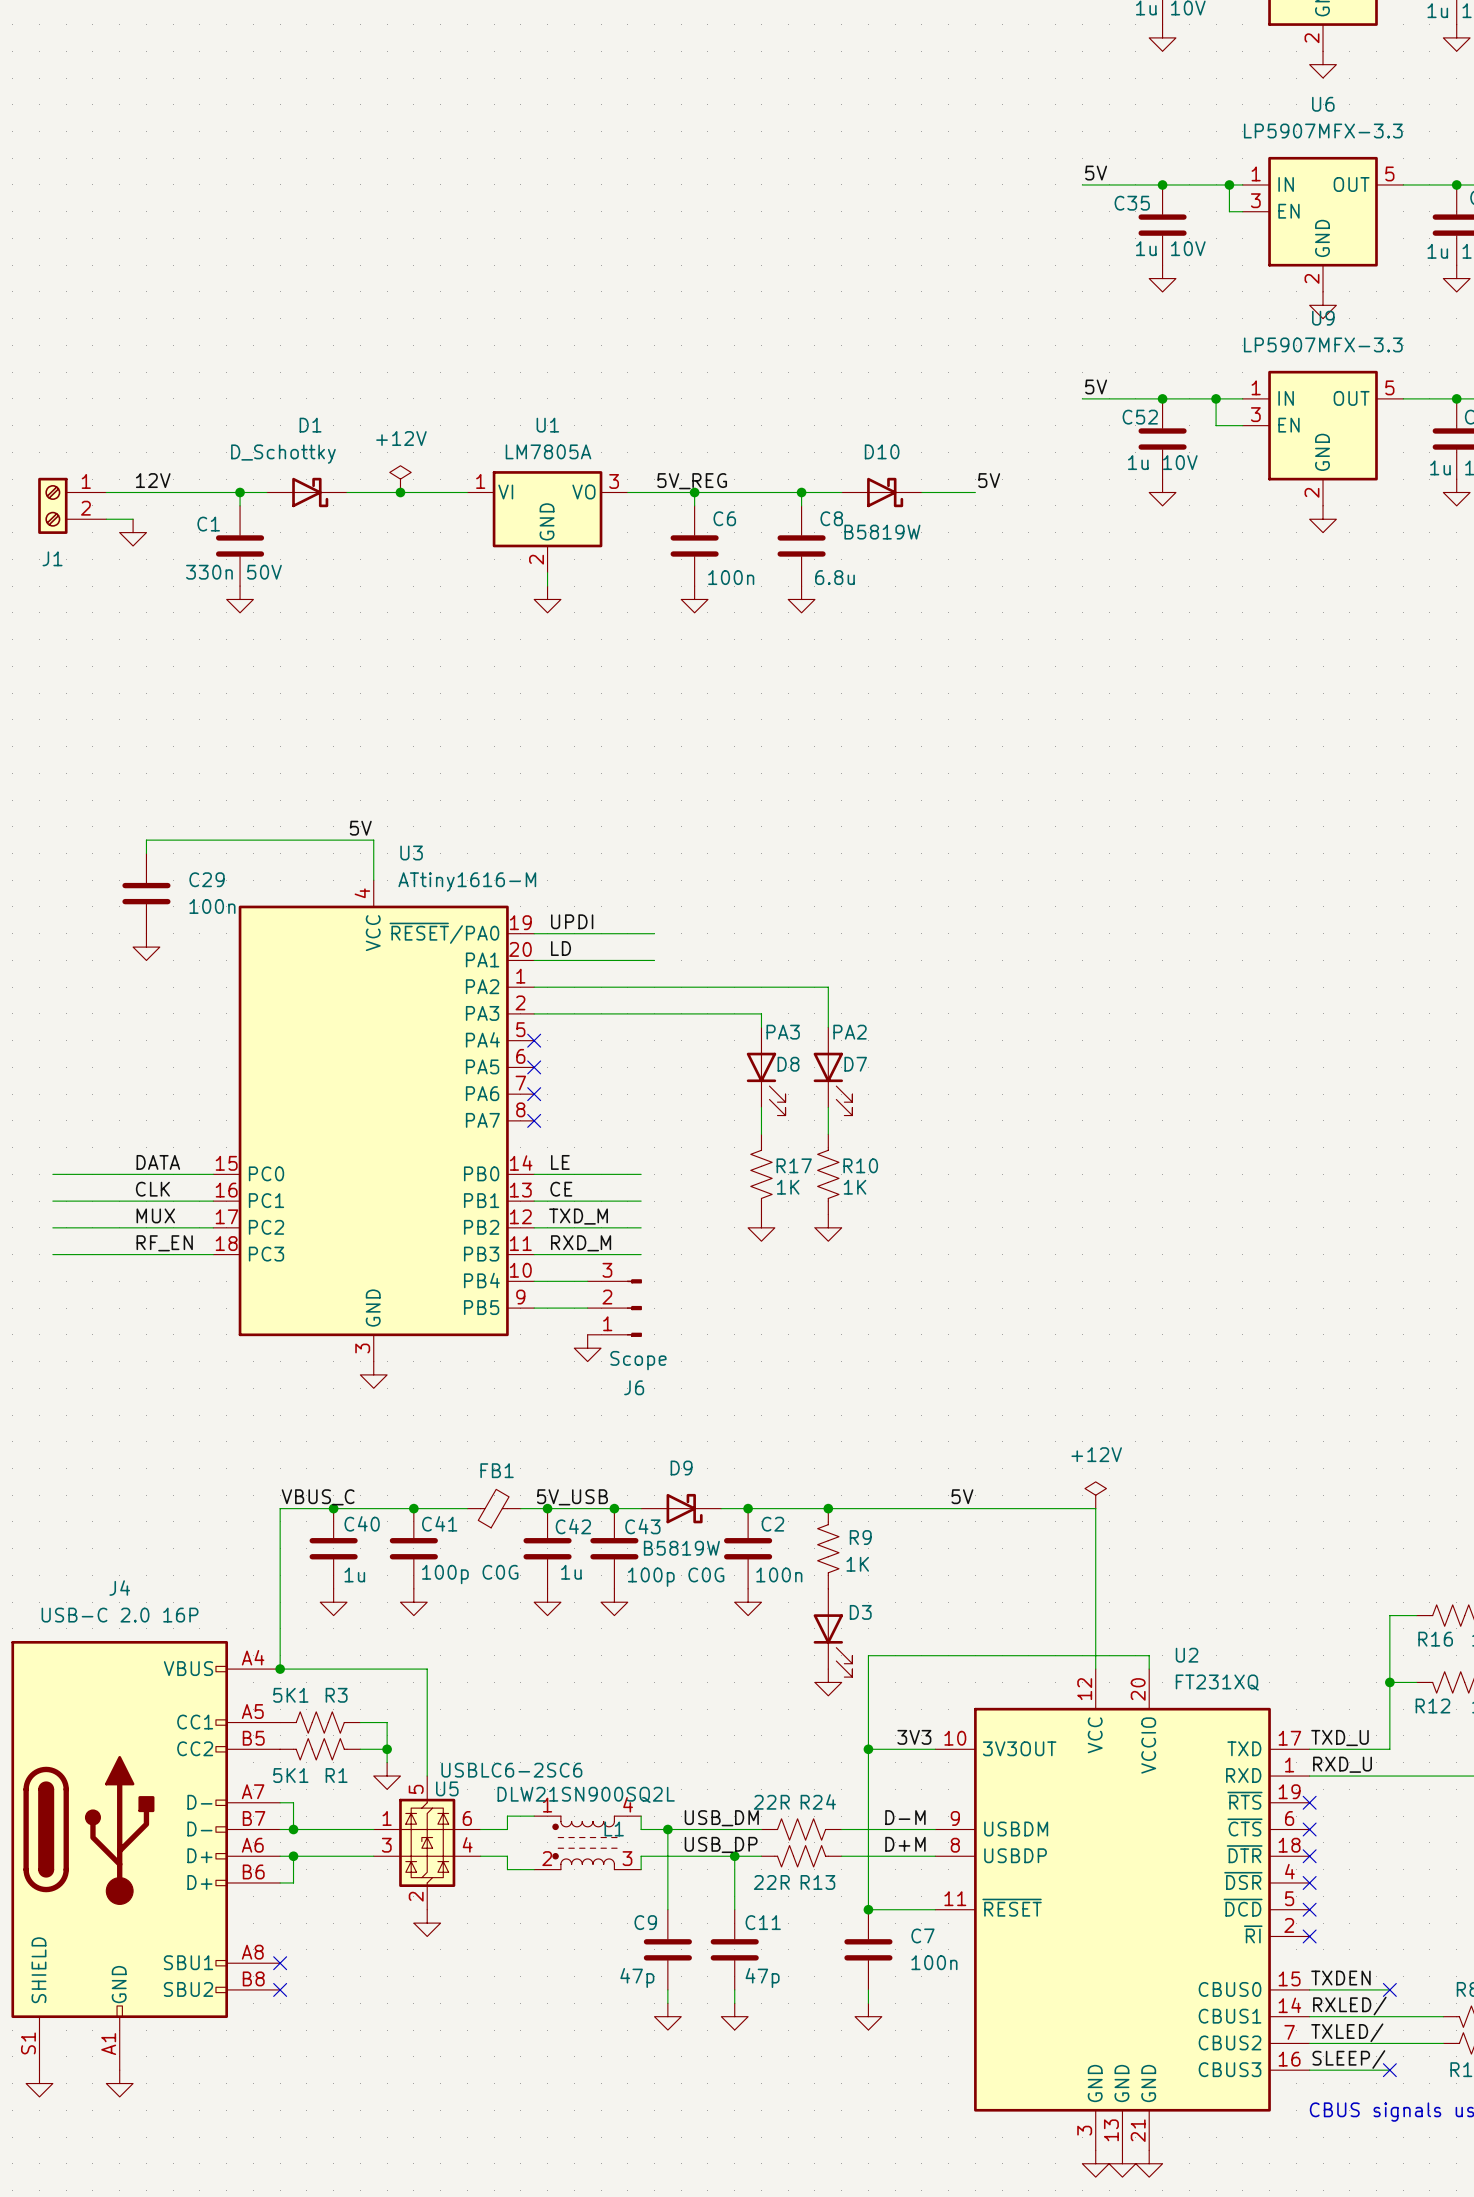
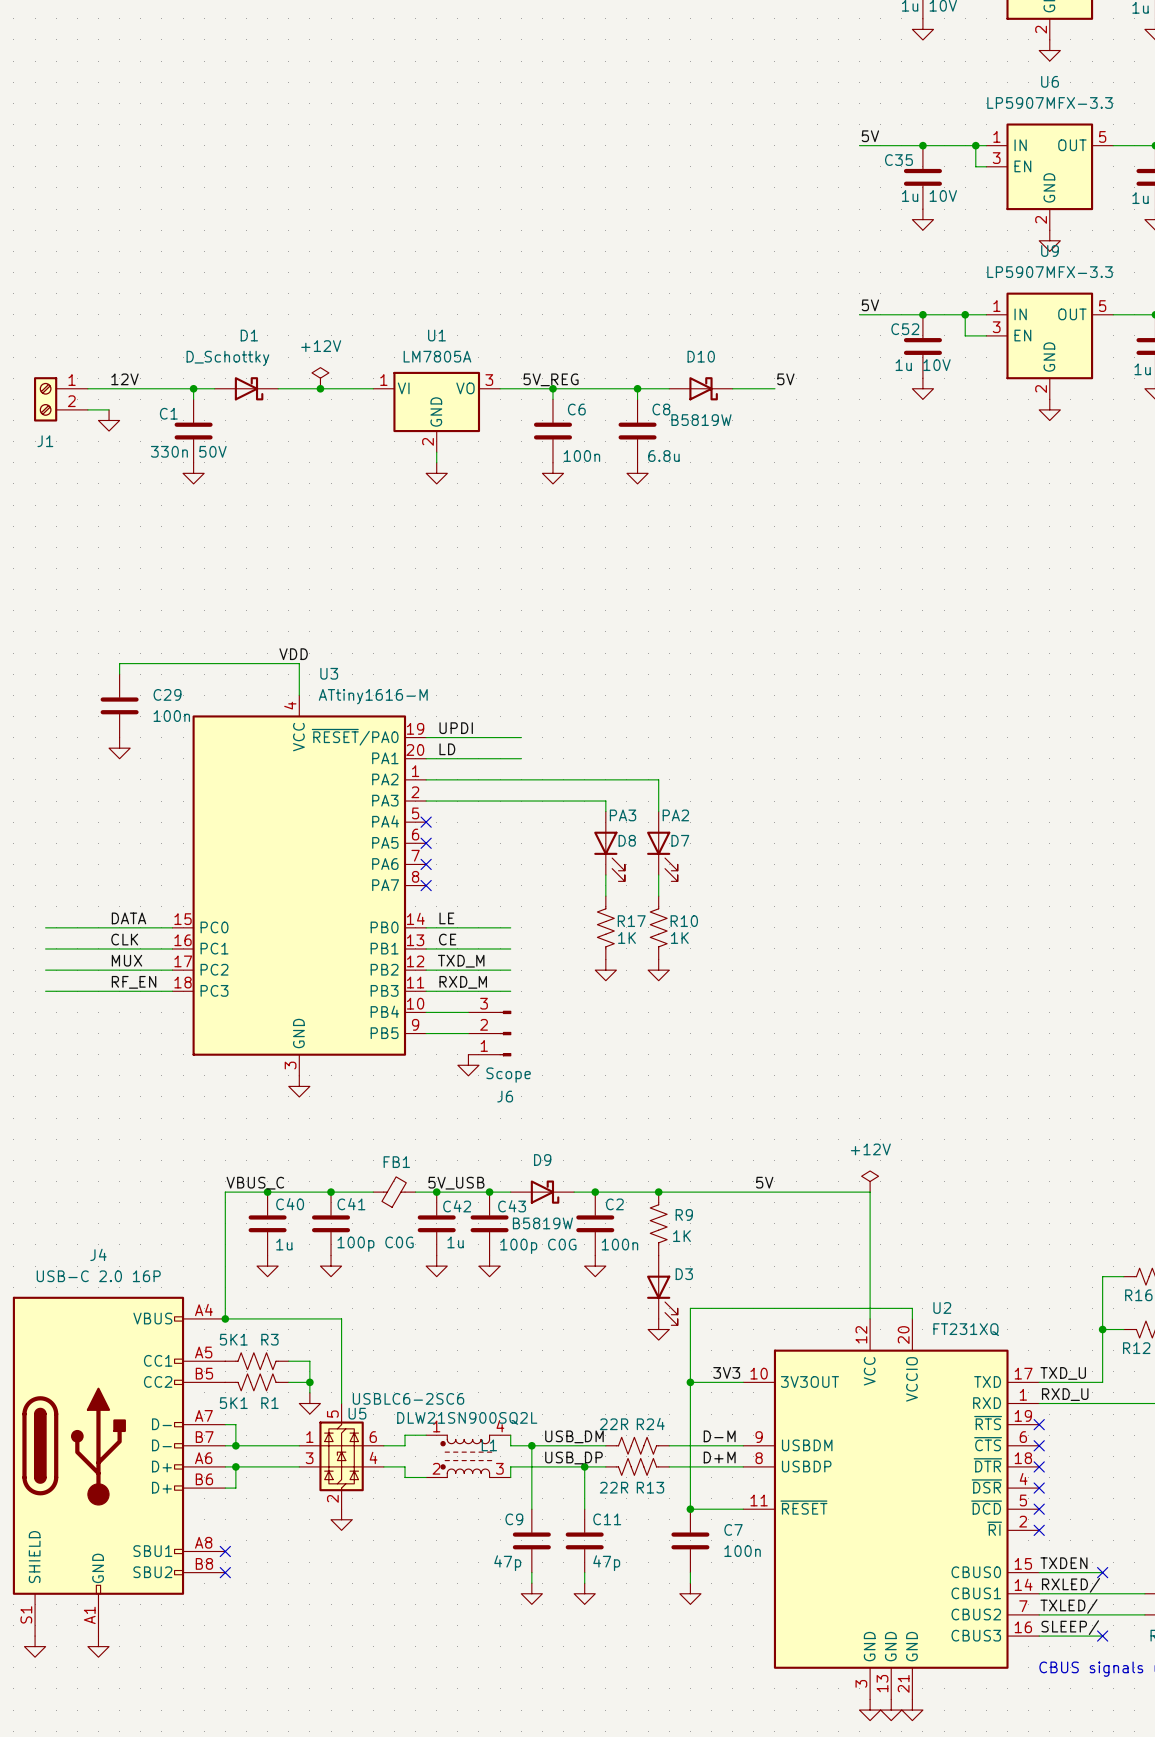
label: 5V (360, 828) -> VDD (293, 654)

